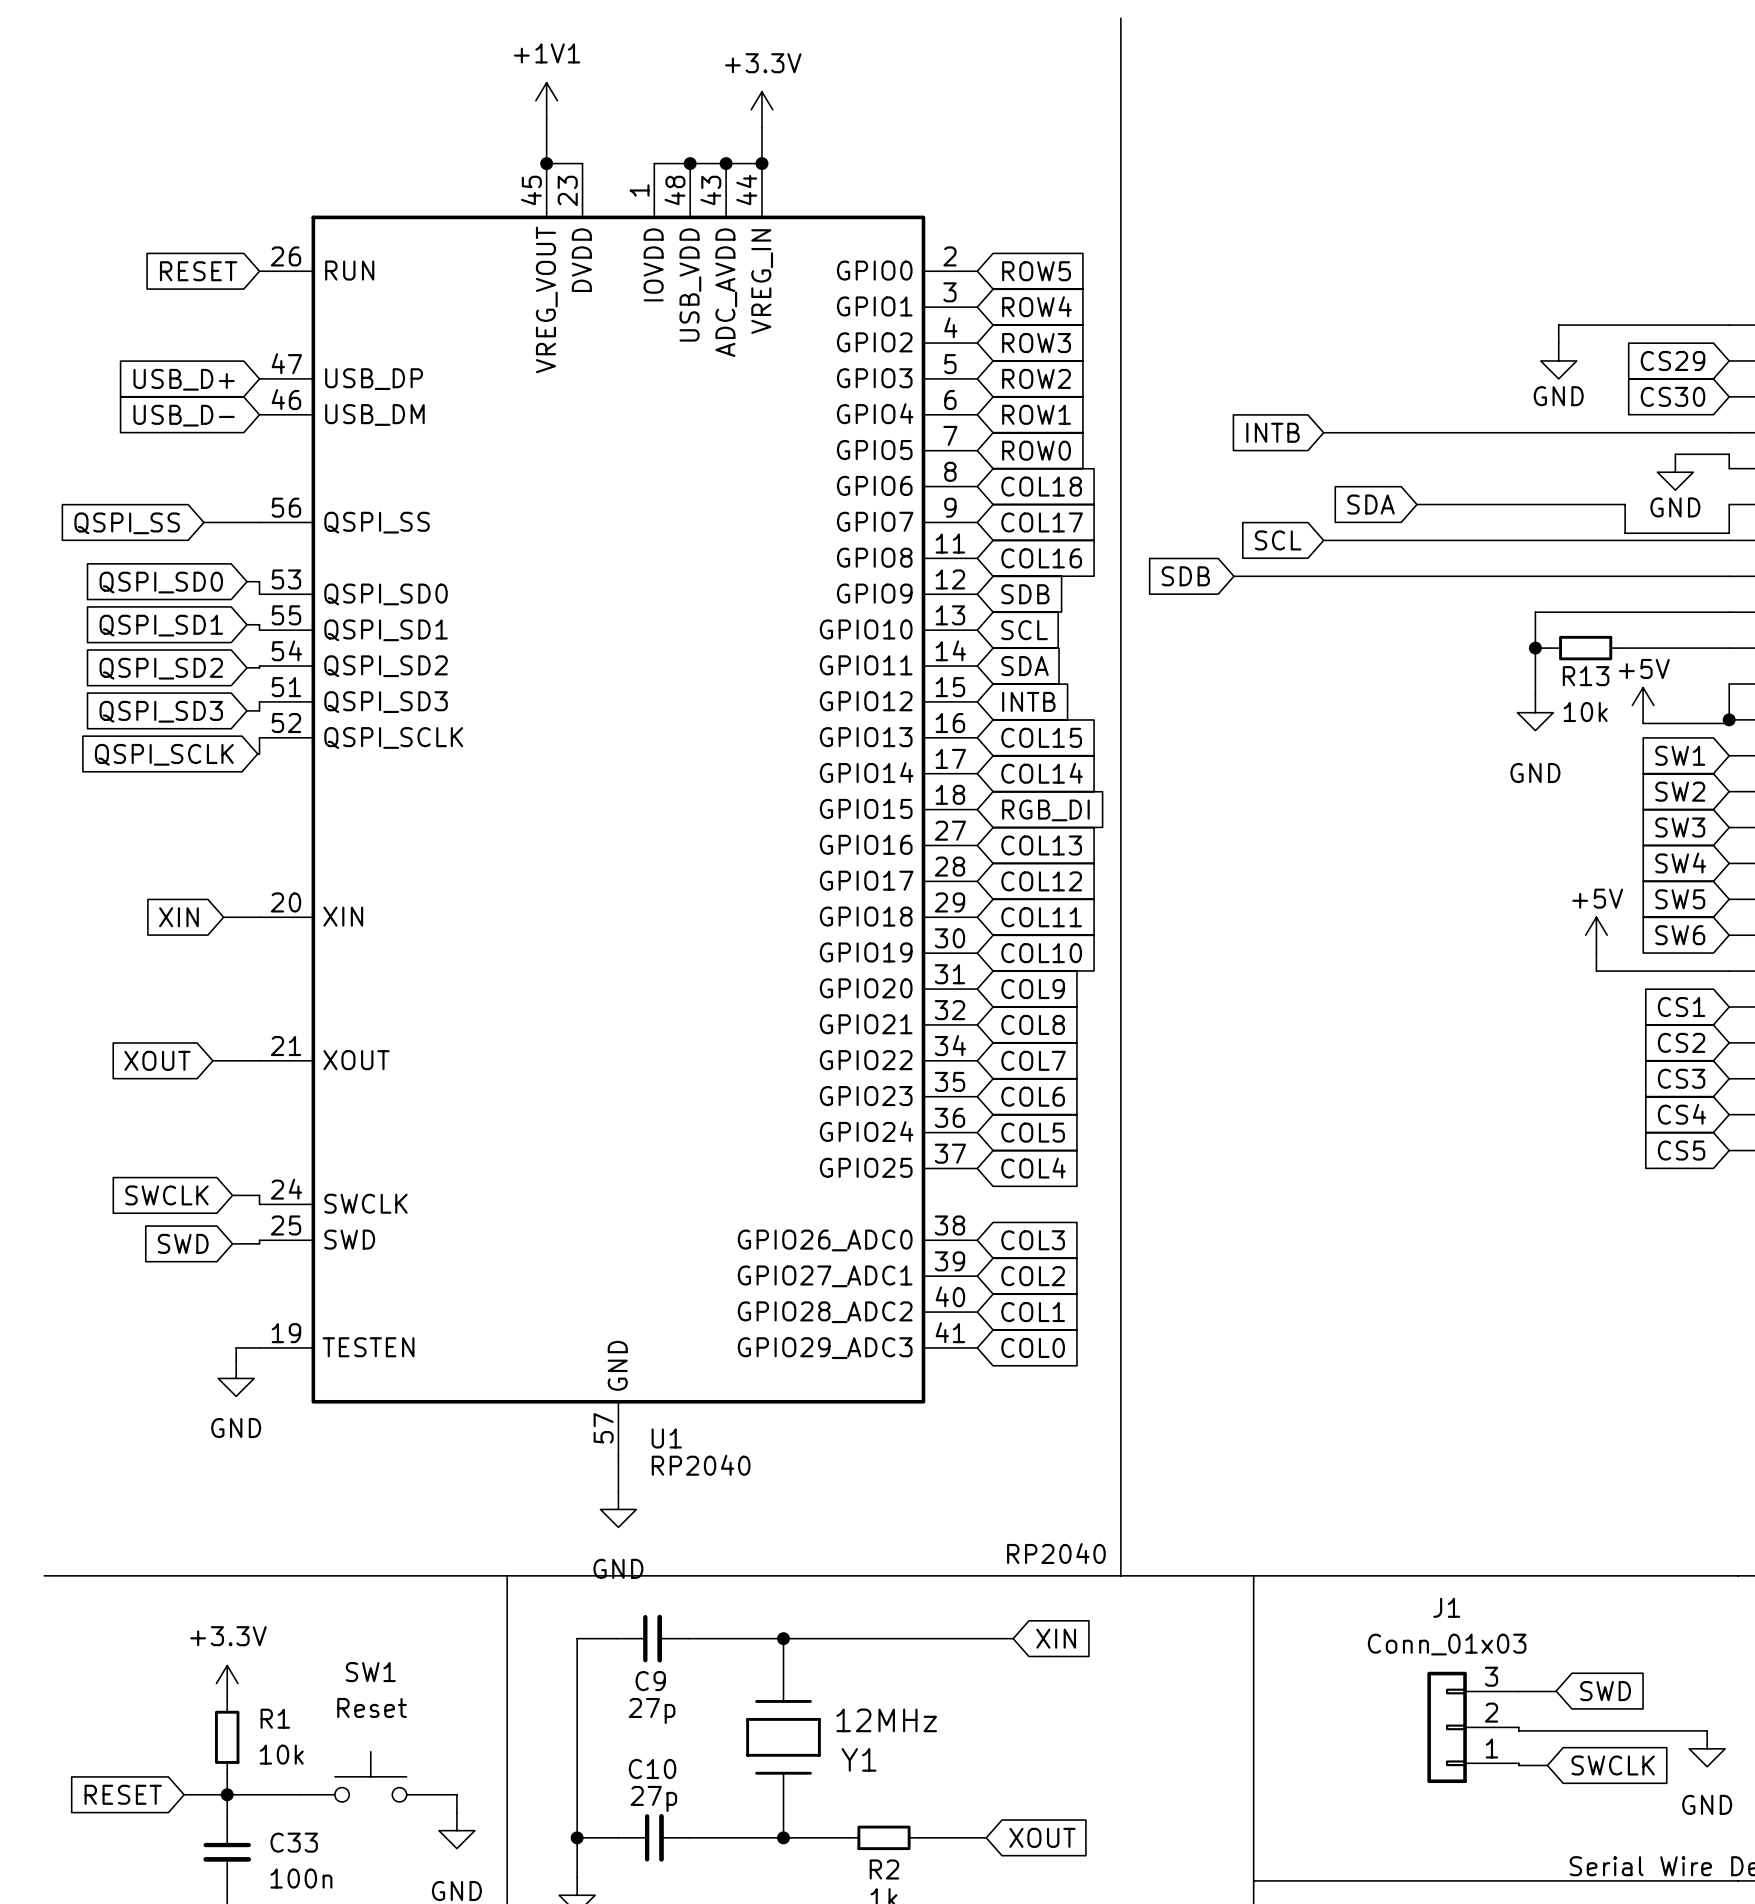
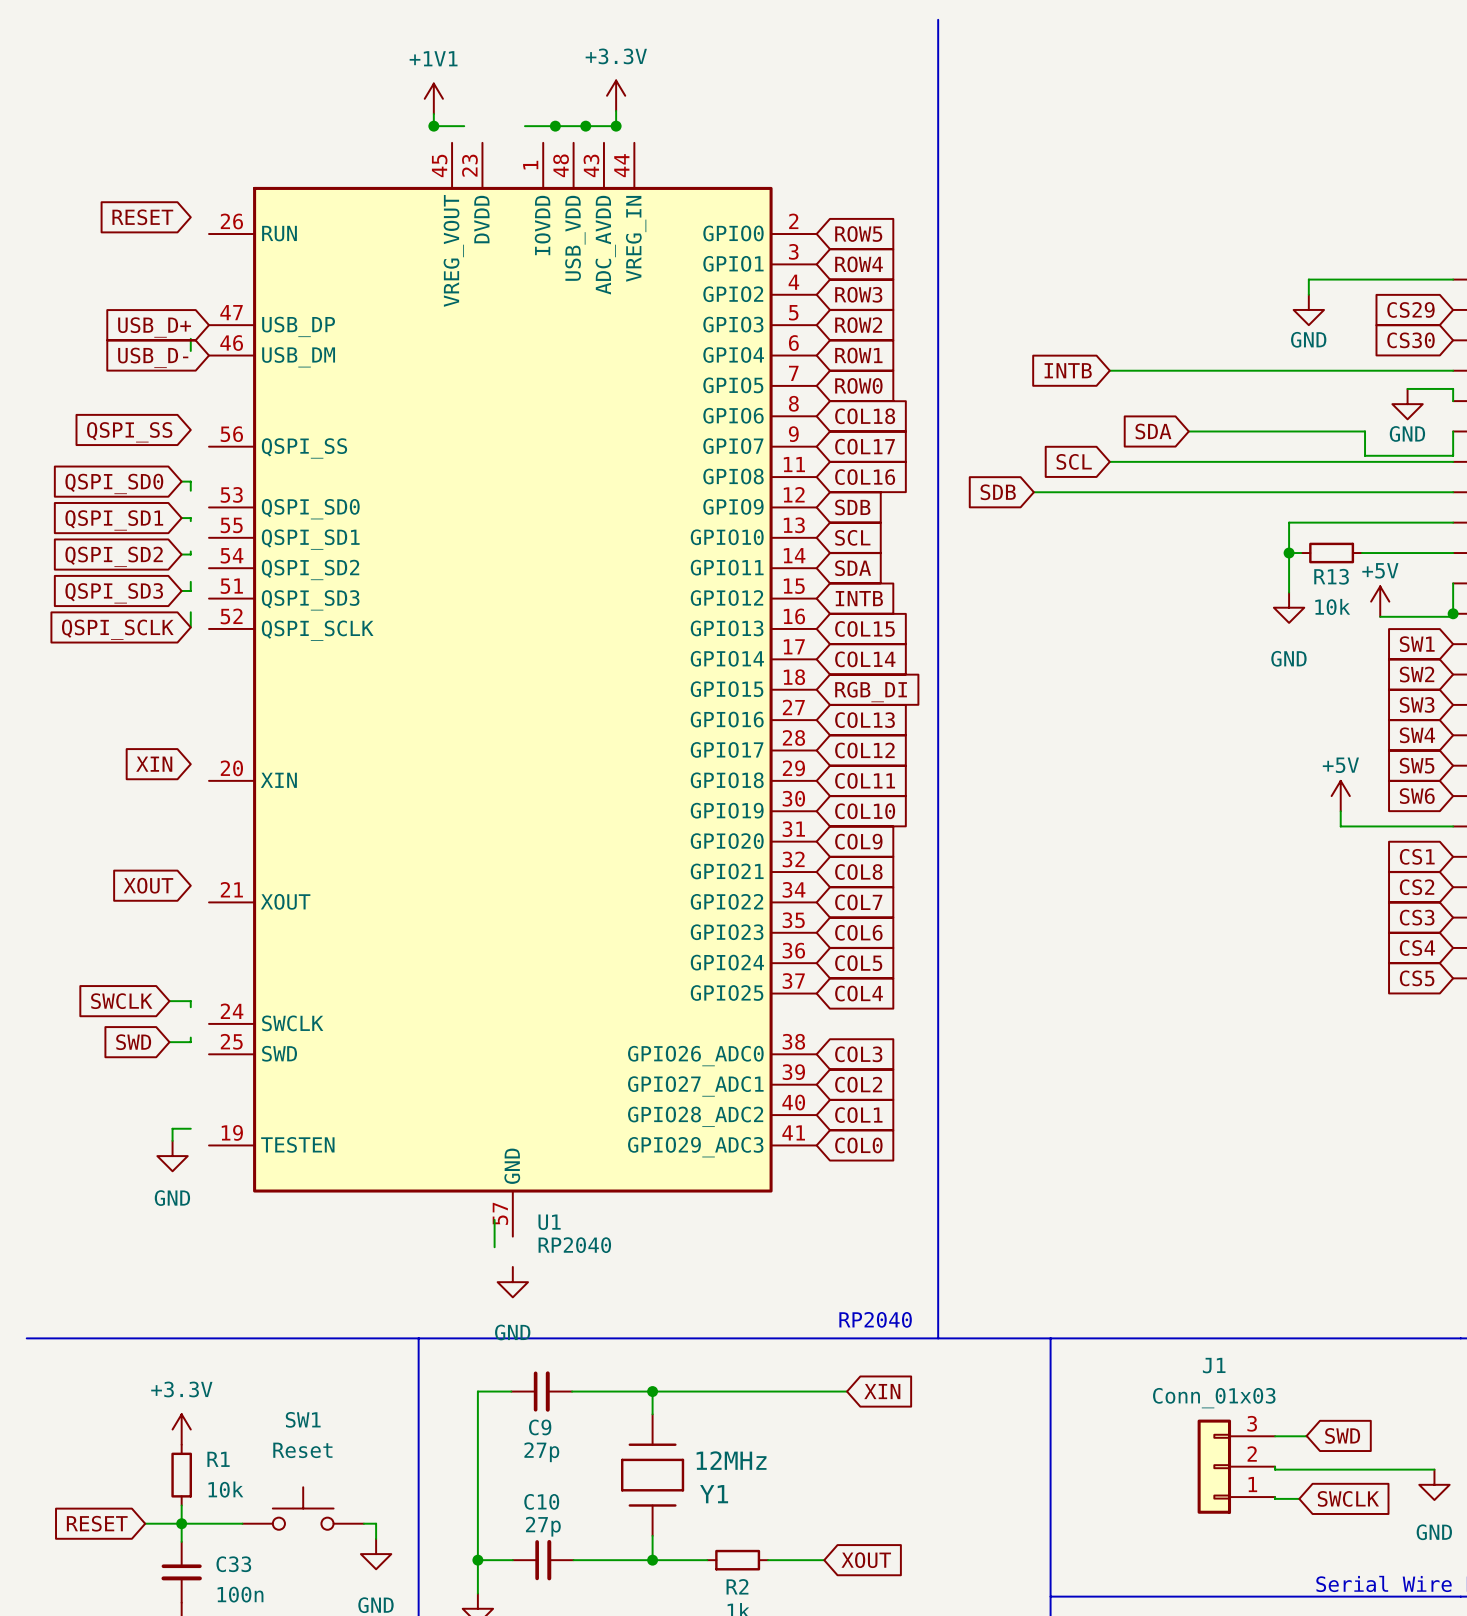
power symbol position: +1V1 (546, 100) -> +1V1 (433, 98)
power symbol position: +3.3V (761, 109) -> +3.3V (616, 95)
wire: (546, 118) (546, 163) (582, 163) -> none
wire: none -> (616, 110) (616, 126) (524, 126)
wire: (761, 127) (761, 163) (654, 163) -> none
wire: none -> (433, 114) (433, 126) (464, 126)
junction: none -> (555, 126)
junction: none -> (585, 126)
junction: none -> (616, 126)
junction position: (546, 163) -> (433, 126)
junction: (690, 163) -> none
junction: (726, 163) -> none
junction: (761, 163) -> none
global label position: RESET (198, 271) -> RESET (142, 217)
wire: none -> (190, 338) (190, 350)
wire: (203, 522) (259, 522) -> none
global label position: QSPI_SS (127, 523) -> QSPI_SS (129, 432)
wire: none -> (181, 481) (190, 481) (190, 490)
wire: (246, 581) (259, 581) (259, 594) -> none
global label position: QSPI_SD0 (161, 582) -> QSPI_SD0 (114, 483)
wire: none -> (181, 518) (190, 518) (190, 521)
wire: (246, 624) (259, 624) (259, 630) -> none
global label position: QSPI_SD1 (161, 625) -> QSPI_SD1 (114, 520)
wire: none -> (190, 551) (190, 554) (181, 554)
wire: (259, 666) (259, 667) (246, 667) -> none
global label position: QSPI_SD2 (161, 668) -> QSPI_SD2 (114, 556)
wire: none -> (190, 581) (190, 590) (181, 590)
wire: (259, 701) (259, 710) (246, 710) -> none
global label position: QSPI_SD3 (161, 711) -> QSPI_SD3 (114, 593)
wire: none -> (190, 612) (190, 627)
wire: (259, 737) (259, 753) (257, 753) -> none
global label position: QSPI_SCLK (164, 754) -> QSPI_SCLK (117, 629)
global label position: XIN (178, 917) -> XIN (154, 764)
wire: (223, 917) (259, 917) -> none
global label position: XOUT (157, 1060) -> XOUT (148, 885)
wire: (212, 1060) (259, 1060) -> none
wire: none -> (169, 1001) (190, 1001) (190, 1007)
global label position: SWCLK (166, 1195) -> SWCLK (121, 1001)
wire: (232, 1195) (259, 1195) (259, 1204) -> none
wire: none -> (190, 1037) (190, 1042) (169, 1042)
wire: (259, 1240) (259, 1243) (232, 1243) -> none
global label position: SWD (183, 1243) -> SWD (133, 1042)
wire: none -> (190, 1128) (172, 1128) (172, 1140)
wire: (259, 1347) (236, 1347) (236, 1360) -> none
power symbol position: GND (236, 1378) -> GND (172, 1156)
wire: none -> (494, 1219) (494, 1247)
wire: (618, 1455) (618, 1491) -> none

